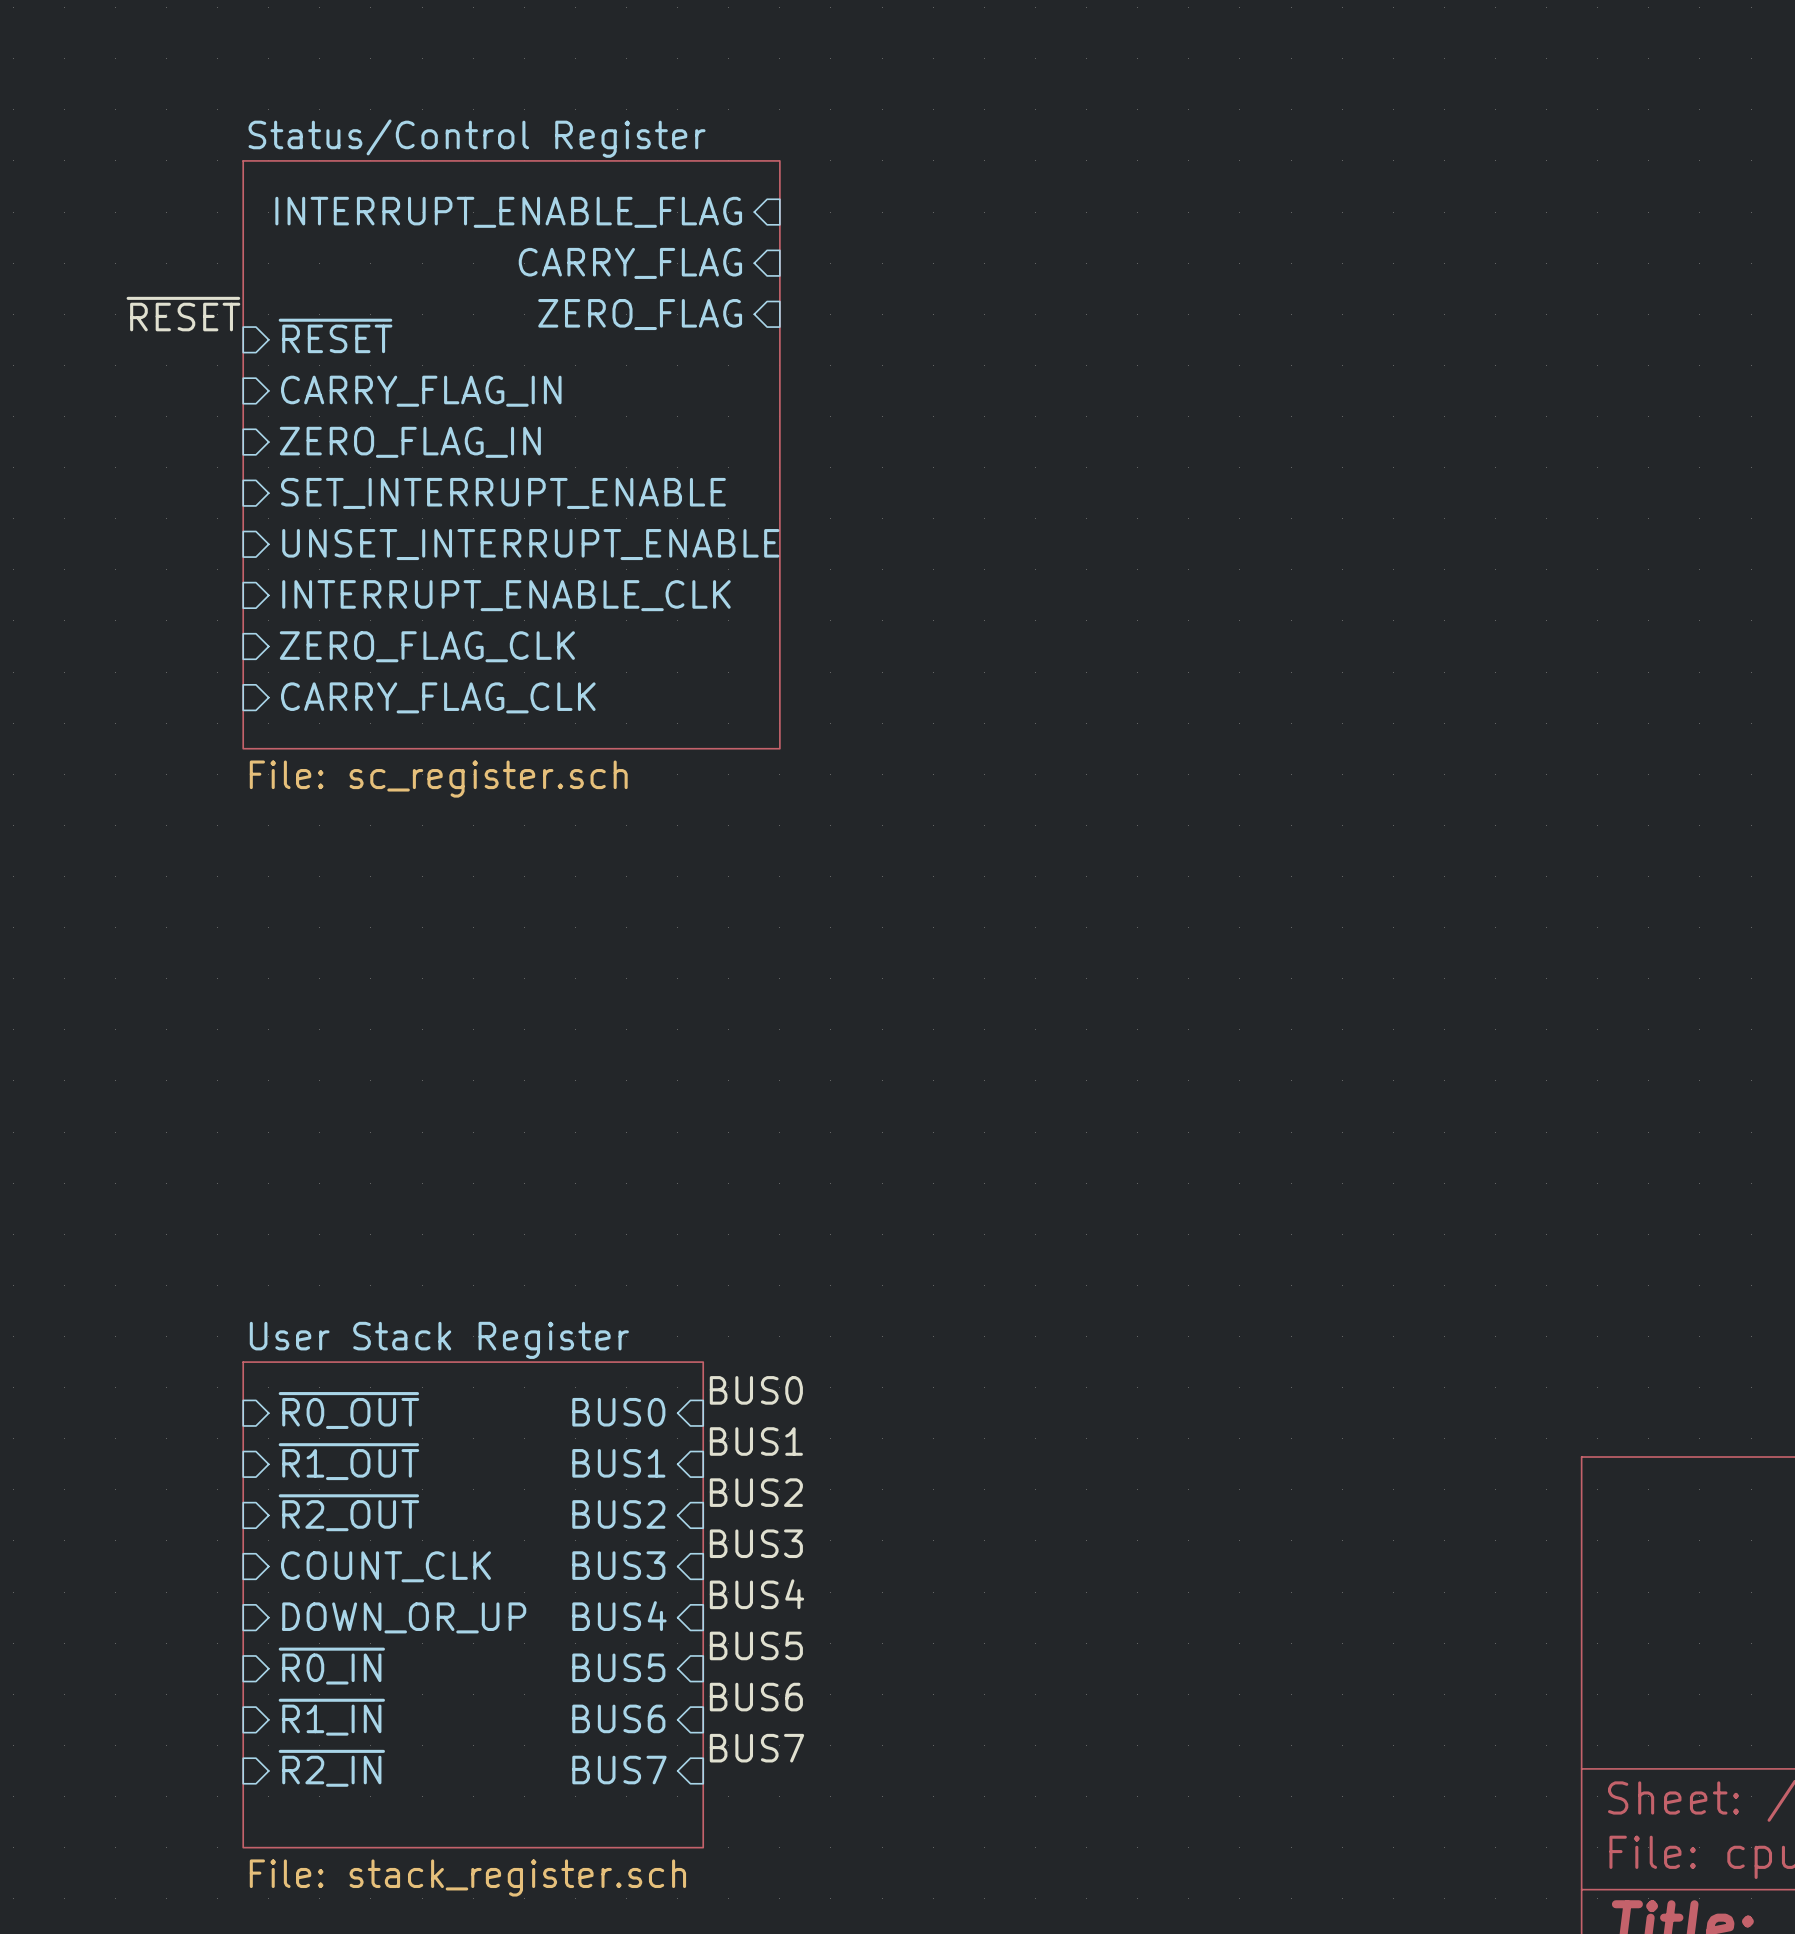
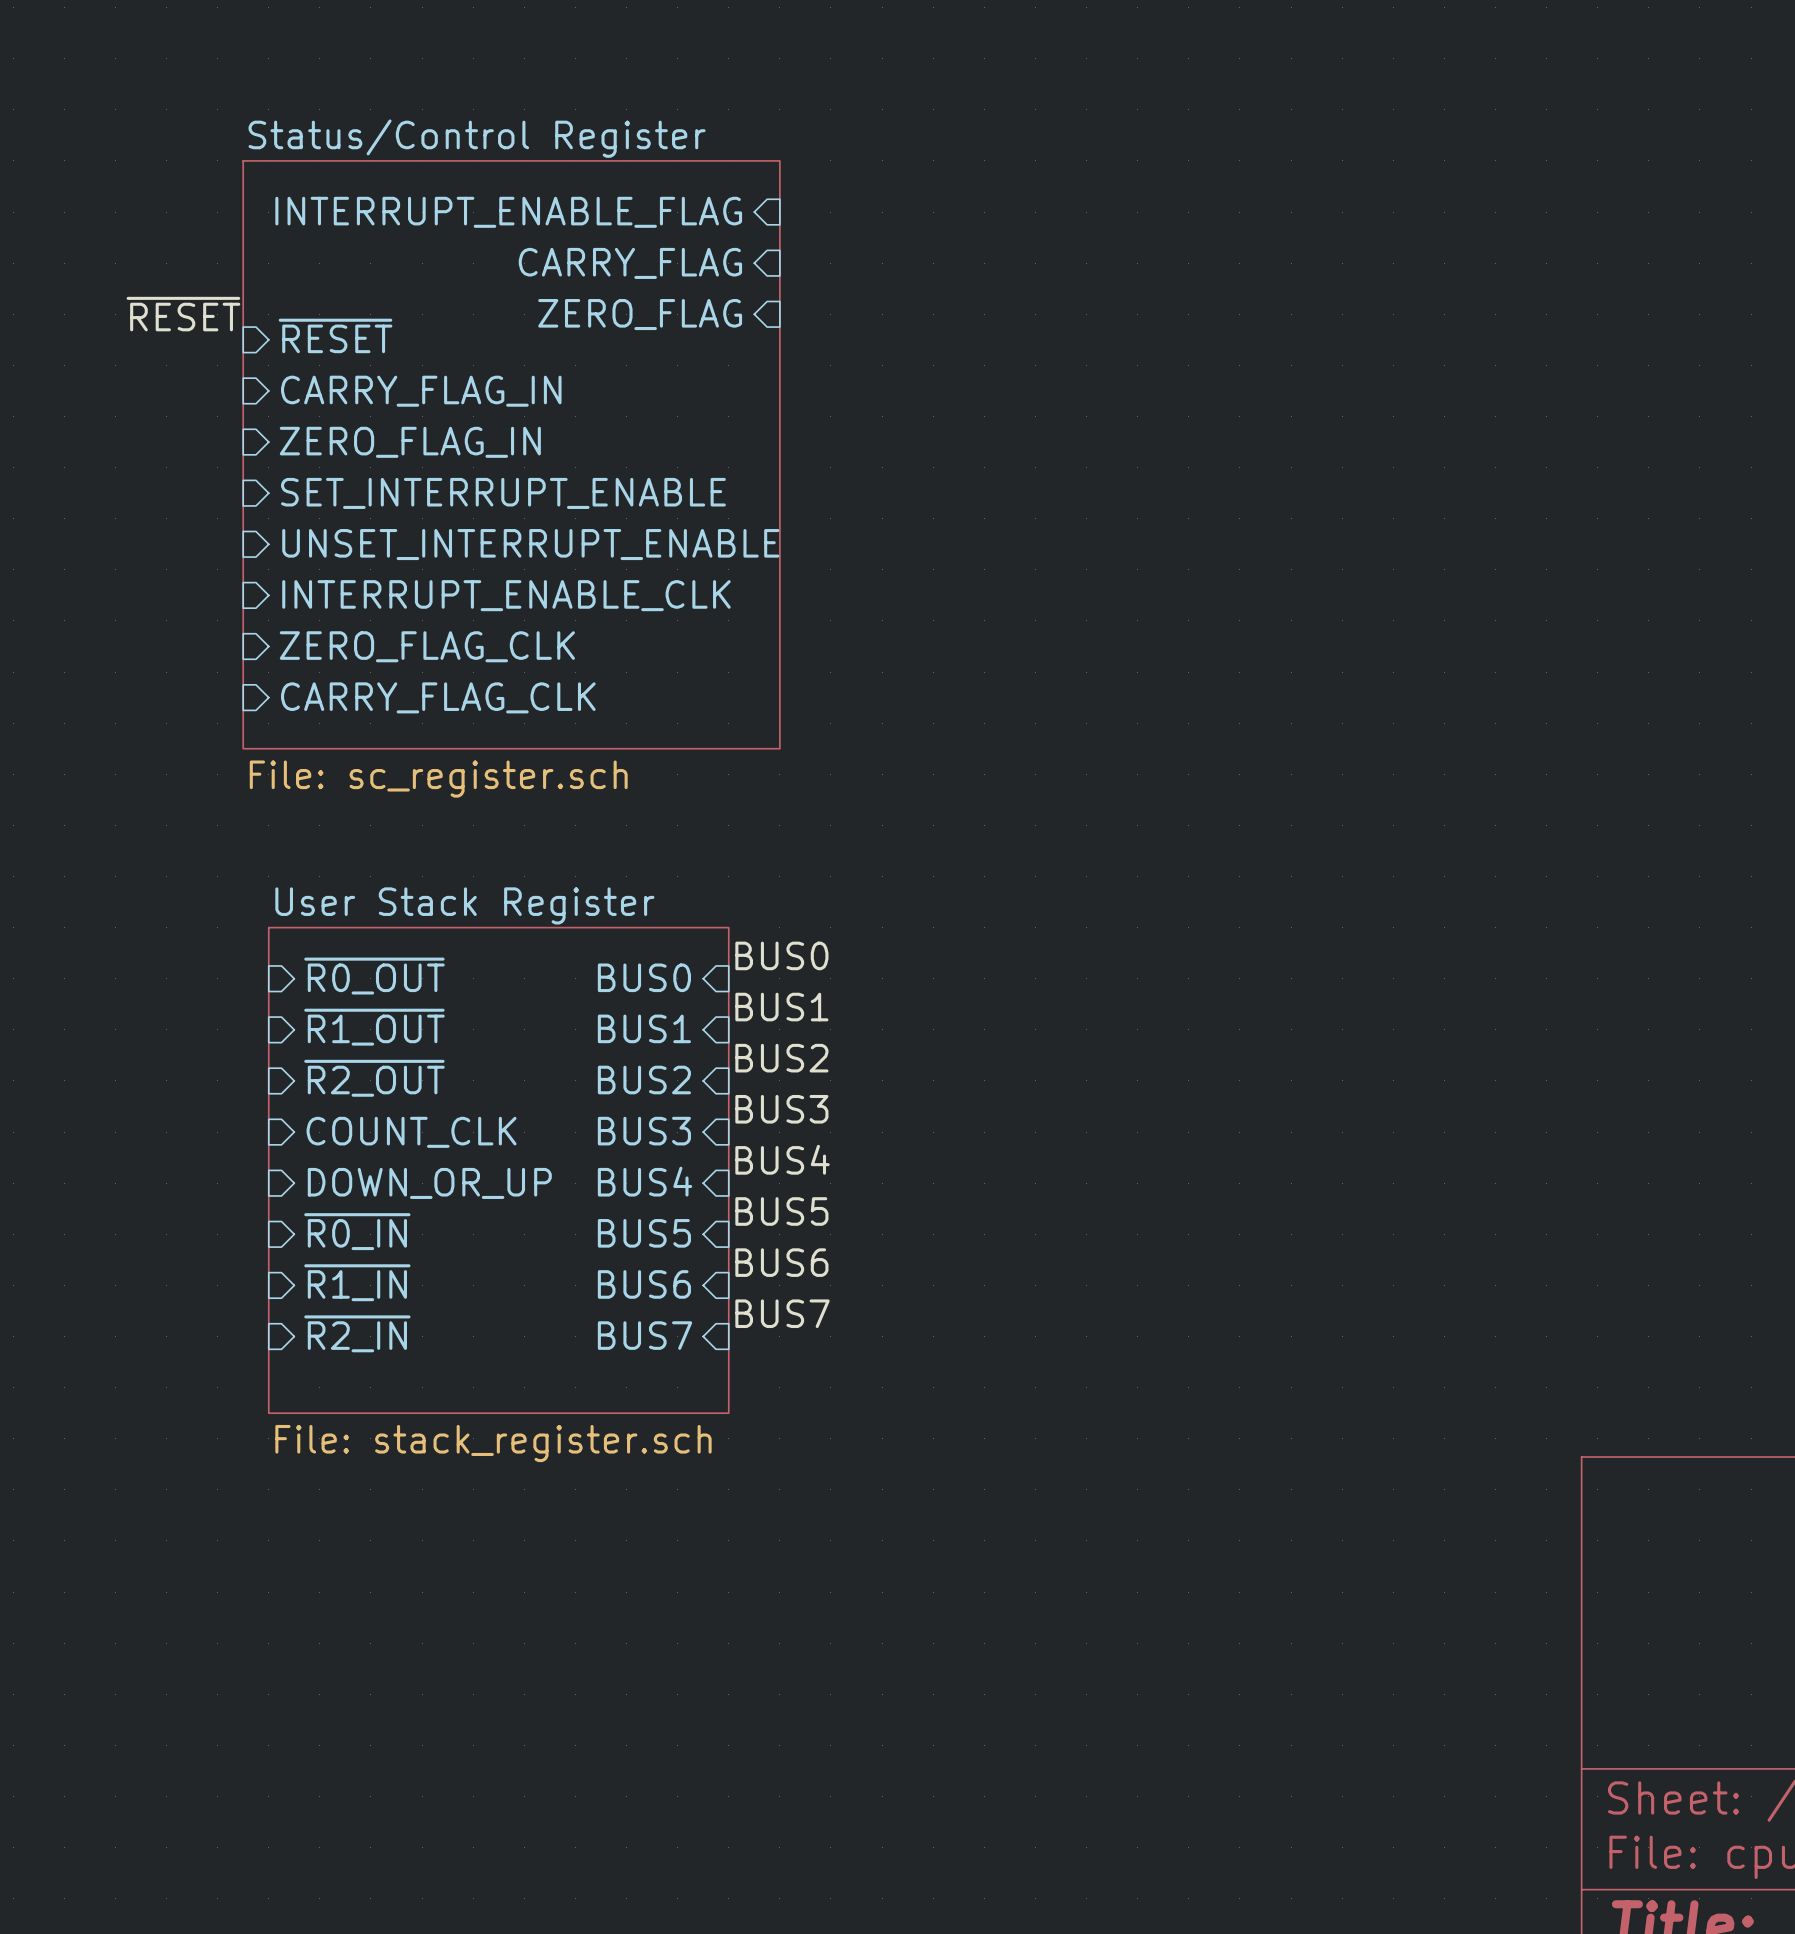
label position: BUS0 (756, 1390) -> BUS0 (781, 955)
sheet pin position: ~{R0_OUT} (348, 1410) -> ~{R0_OUT} (374, 976)
sheet pin position: BUS0 (618, 1412) -> BUS0 (644, 977)
label position: BUS1 (756, 1441) -> BUS1 (781, 1007)
sheet pin position: ~{R1_OUT} (348, 1461) -> ~{R1_OUT} (374, 1027)
sheet pin position: BUS1 (618, 1463) -> BUS1 (644, 1028)
label position: BUS2 (756, 1492) -> BUS2 (781, 1058)
sheet pin position: ~{R2_OUT} (348, 1512) -> ~{R2_OUT} (374, 1078)
sheet pin position: BUS2 (618, 1514) -> BUS2 (644, 1080)
label position: BUS3 (756, 1543) -> BUS3 (781, 1109)
sheet pin position: BUS3 (618, 1565) -> BUS3 (644, 1131)
sheet pin position: COUNT_CLK (385, 1566) -> COUNT_CLK (411, 1132)
label position: BUS4 (756, 1594) -> BUS4 (782, 1159)
sheet User Stack Register position: (473, 1604) -> (498, 1170)
sheet pin position: BUS4 (619, 1616) -> BUS4 (645, 1181)
sheet pin position: DOWN_OR_UP (404, 1617) -> DOWN_OR_UP (429, 1183)
label position: BUS5 (756, 1645) -> BUS5 (781, 1211)
sheet pin position: ~{R0_IN} (331, 1666) -> ~{R0_IN} (357, 1231)
sheet pin position: BUS5 (618, 1667) -> BUS5 (644, 1233)
label position: BUS6 (756, 1697) -> BUS6 (781, 1262)
sheet pin position: ~{R1_IN} (331, 1717) -> ~{R1_IN} (357, 1282)
sheet pin position: BUS6 (618, 1718) -> BUS6 (644, 1284)
label position: BUS7 (756, 1748) -> BUS7 (782, 1313)
sheet pin position: ~{R2_IN} (331, 1768) -> ~{R2_IN} (357, 1333)
sheet pin position: BUS7 (619, 1770) -> BUS7 (645, 1335)

